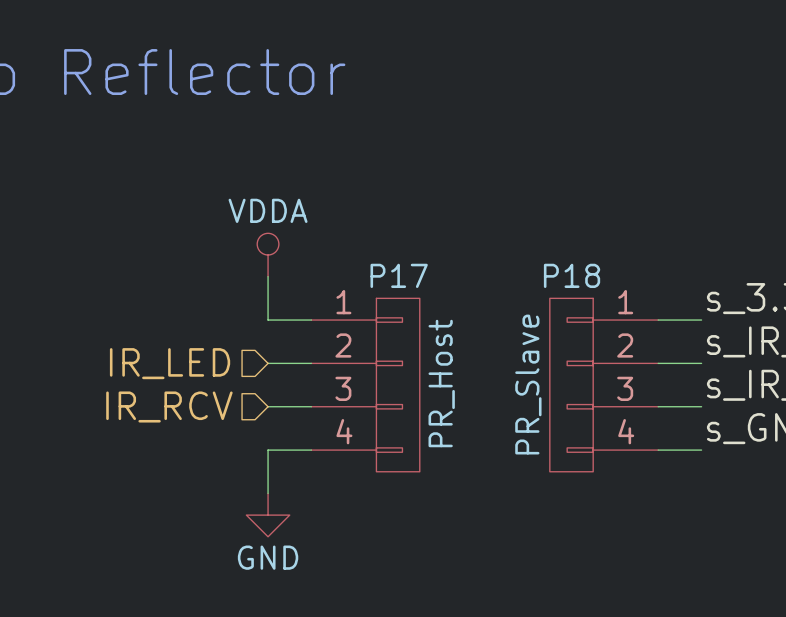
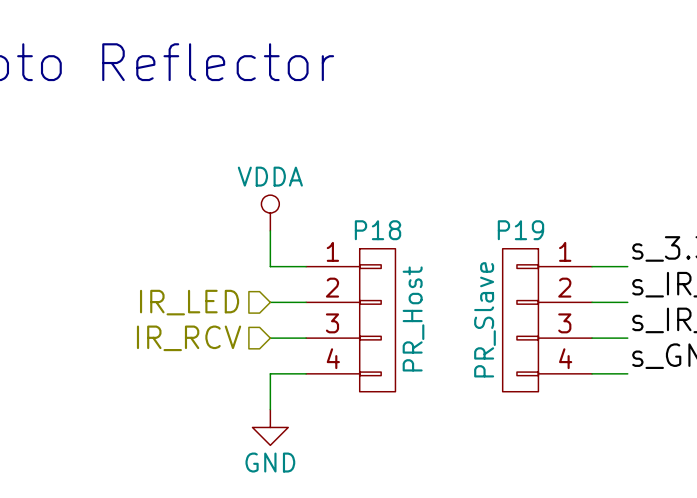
P17 name: P17 (399, 275) -> P18 (378, 230)
P18 name: P18 (572, 275) -> P19 (520, 230)

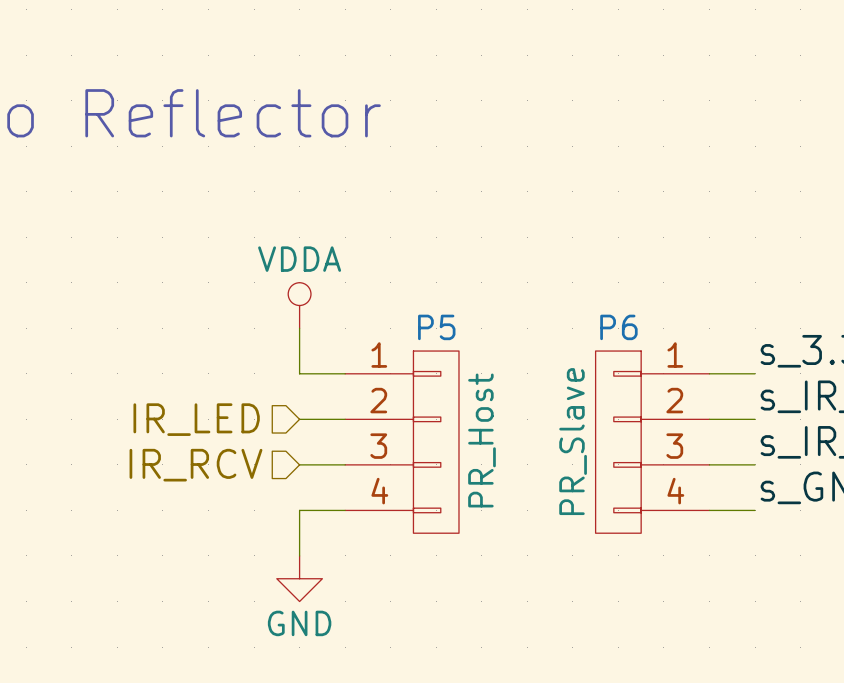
P18 name: P18 (378, 230) -> P5 (436, 327)
P19 name: P19 (520, 230) -> P6 (618, 327)

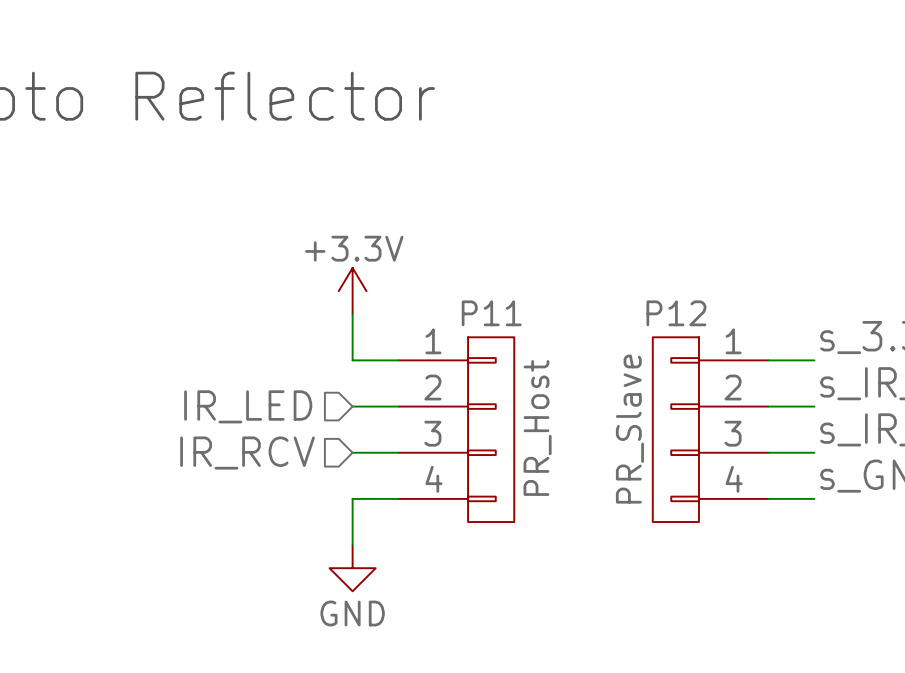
power symbol: VDDA (299, 305) -> +3.3V (352, 291)
P5 name: P5 (436, 327) -> P11 (491, 313)
P6 name: P6 (618, 327) -> P12 (676, 313)

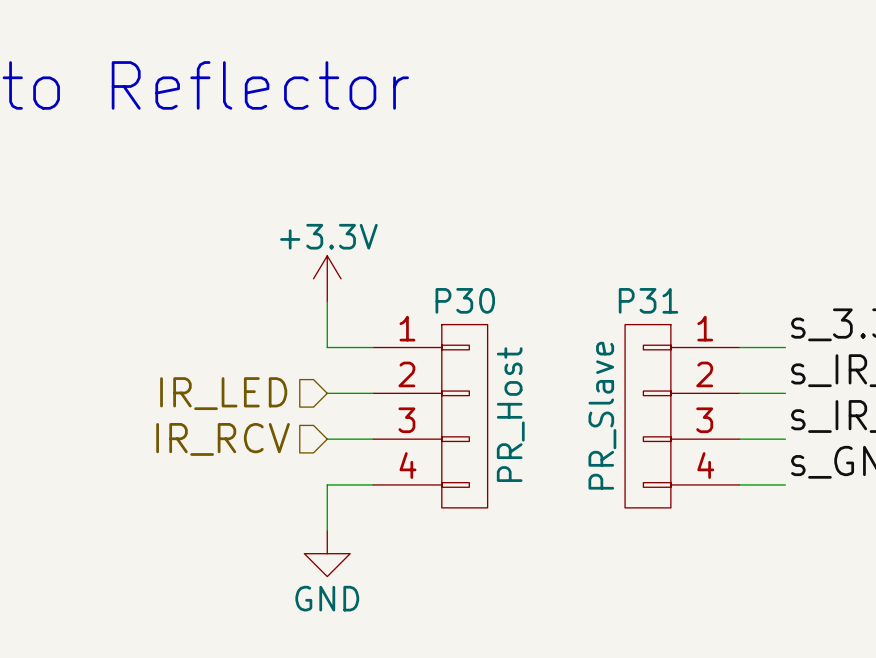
P11 name: P11 (491, 313) -> P30 (465, 300)
P12 name: P12 (676, 313) -> P31 (648, 300)

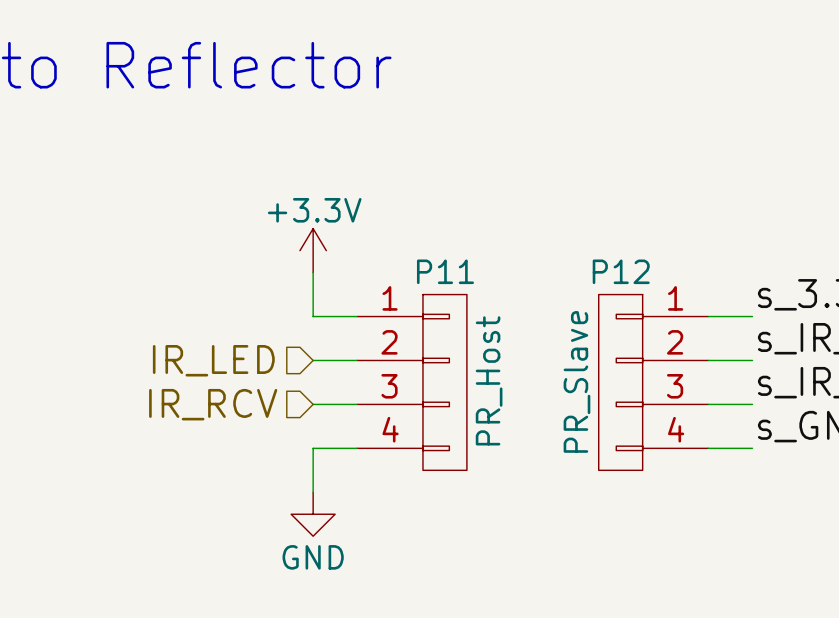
P30 name: P30 (465, 300) -> P11 (445, 271)
P31 name: P31 (648, 300) -> P12 (621, 271)

